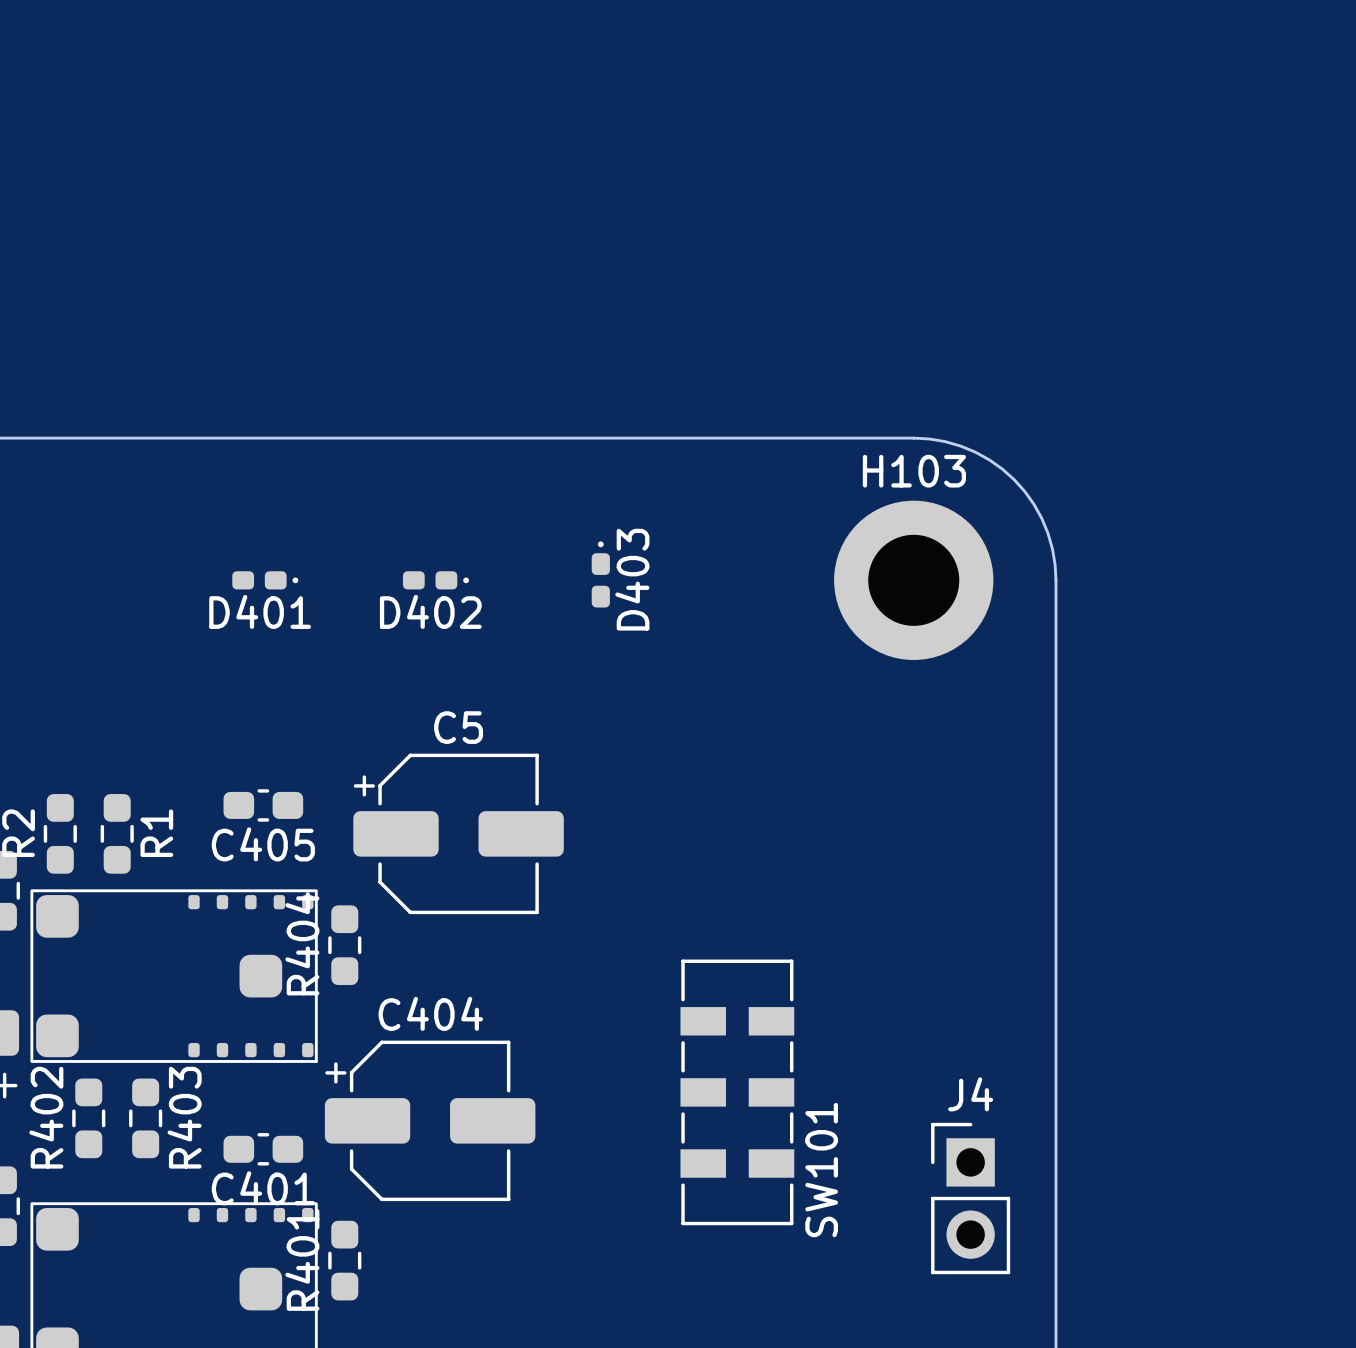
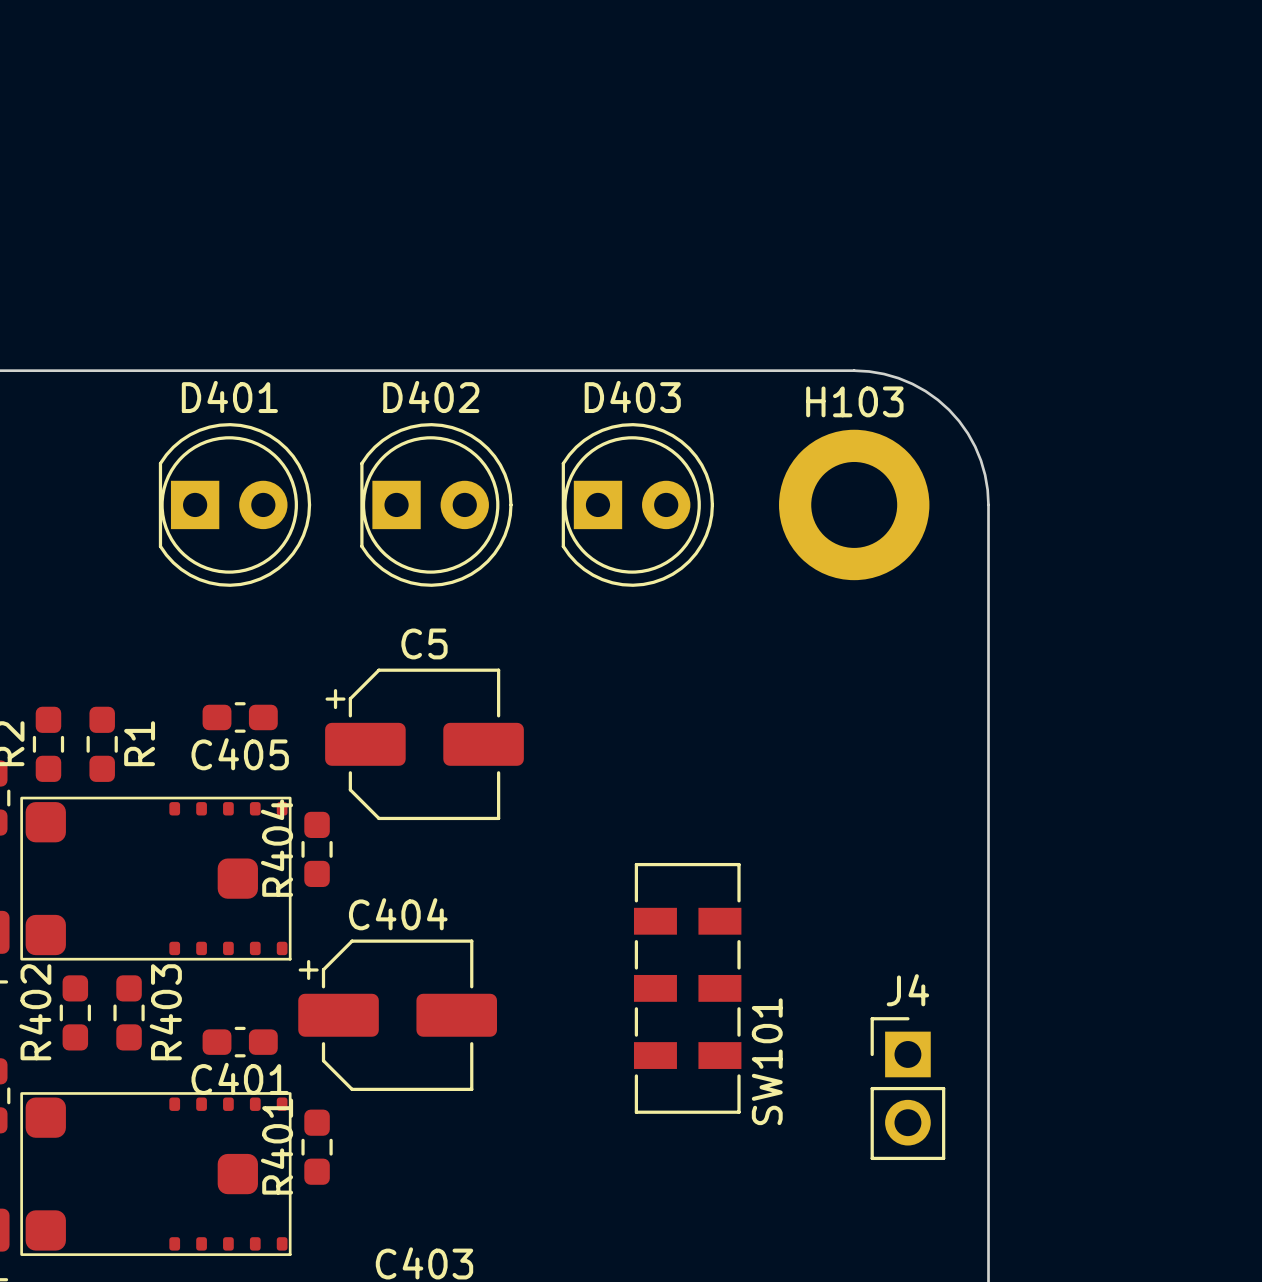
D403 footprint: [591, 541, 610, 608] -> [561, 423, 715, 587]
D401 footprint: [232, 571, 299, 590] -> [158, 423, 312, 587]
D402 footprint: [402, 571, 469, 590] -> [360, 423, 513, 587]
D403 name position: D403 (632, 579) -> D403 (632, 396)
D401 name position: D401 (260, 611) -> D401 (229, 396)
D402 name position: D402 (430, 611) -> D402 (431, 396)

